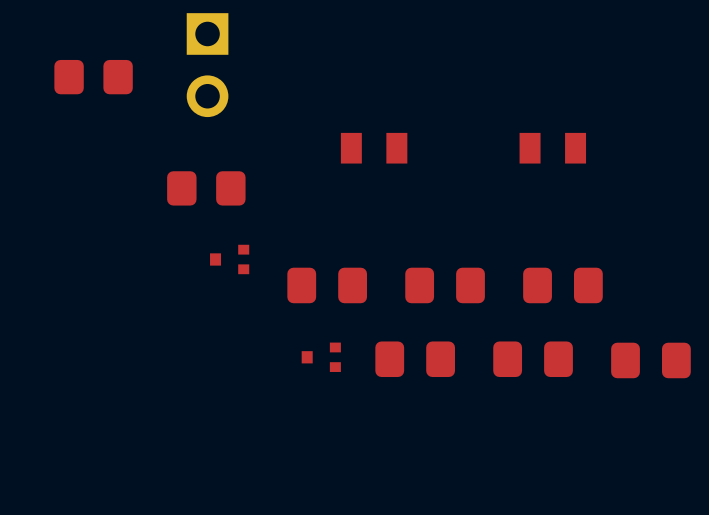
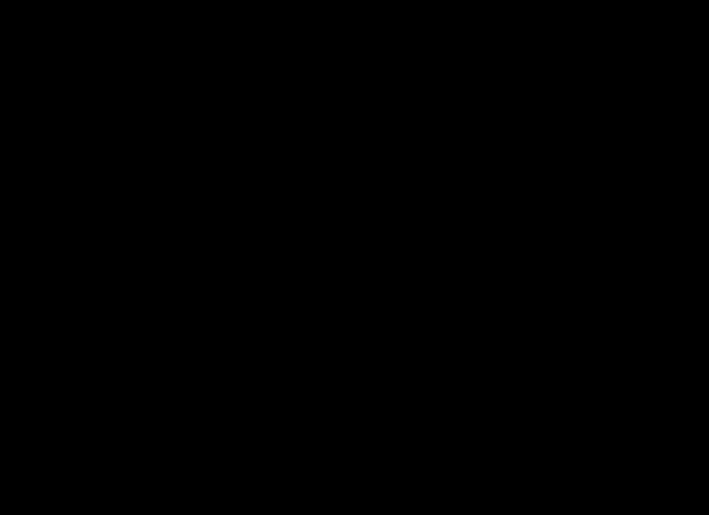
part: (207, 65) -> none
part: (93, 77) -> none
part: (374, 148) -> none
part: (552, 148) -> none
part: (206, 188) -> none
part: (229, 259) -> none
part: (327, 285) -> none
part: (445, 285) -> none
part: (562, 285) -> none
part: (321, 357) -> none
part: (415, 359) -> none
part: (533, 359) -> none
part: (650, 360) -> none

